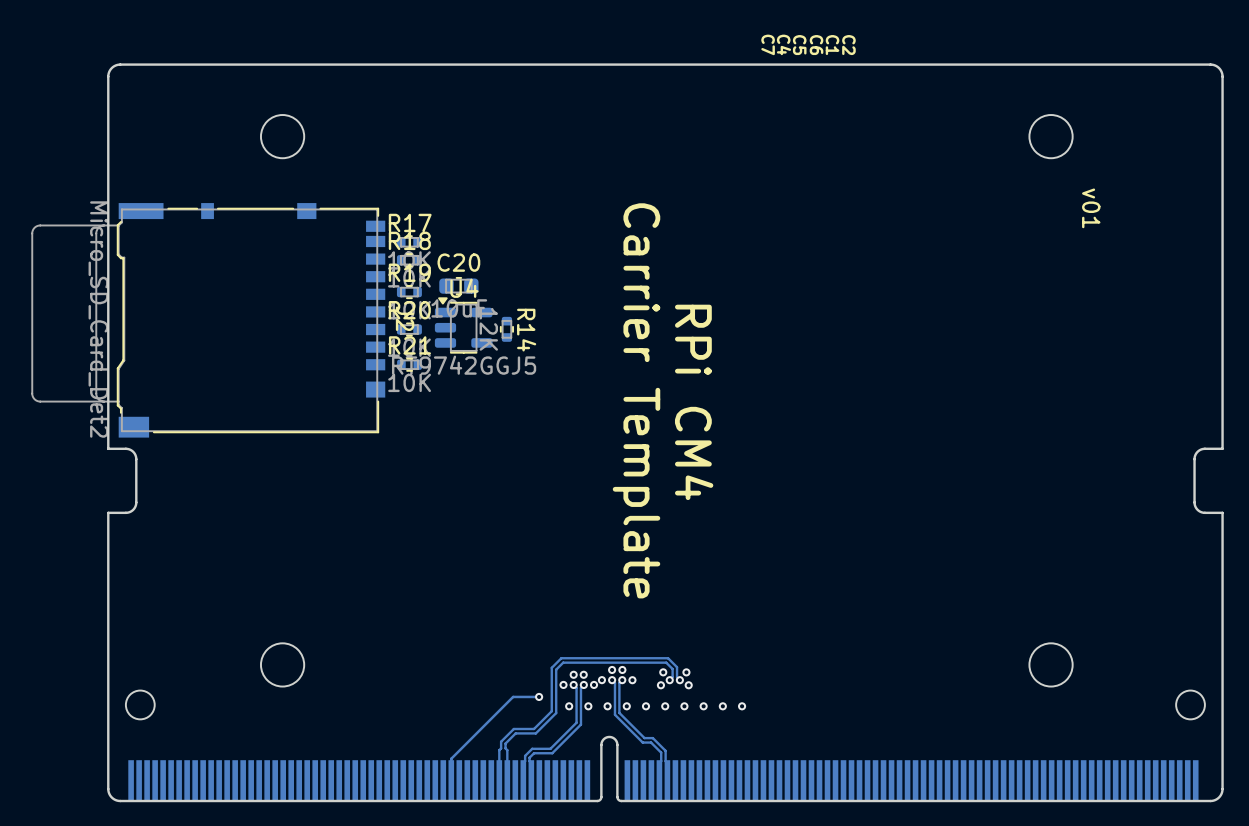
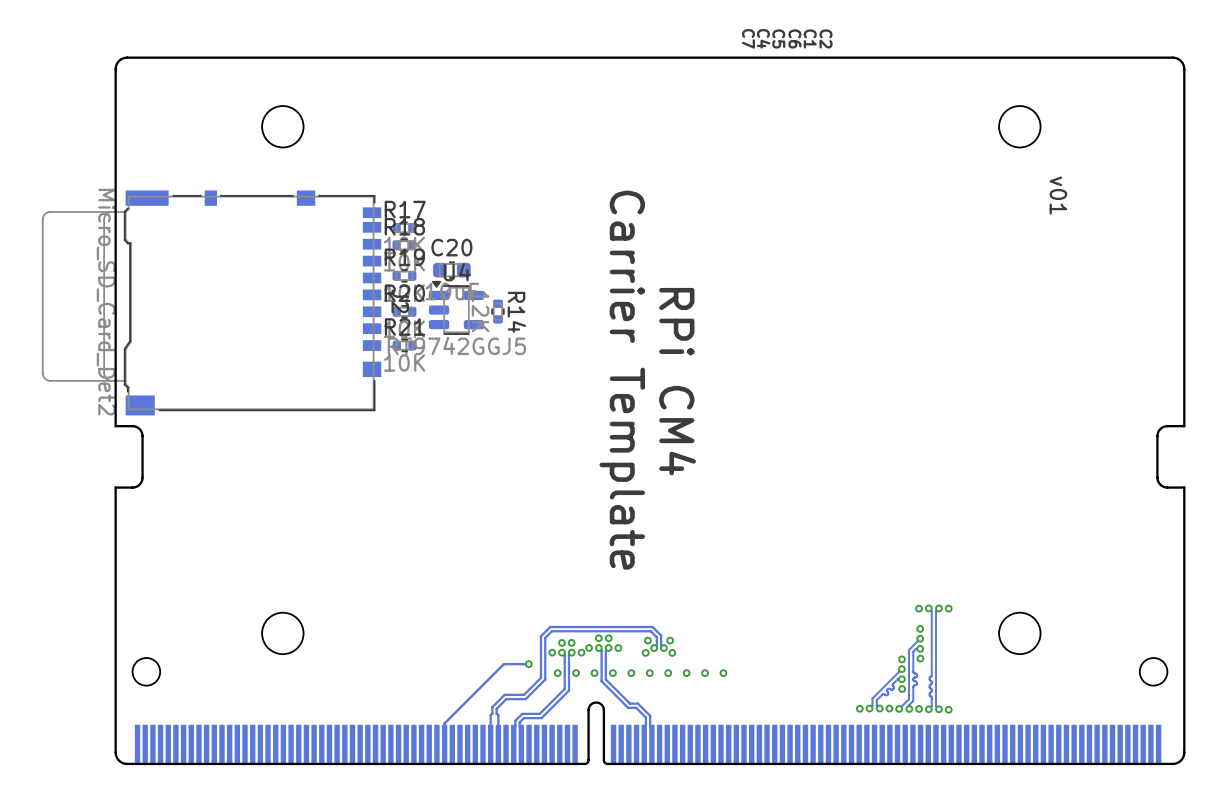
track: none -> (928, 608) (931, 611) (931, 675) (929, 677) (931, 683) (929, 685) (931, 689) (929, 695) (931, 697) (931, 706) (928, 709)
via: none -> (928, 608)
track: none -> (938, 608) (936, 611) (936, 706) (938, 709)
via: none -> (938, 608)
via: none -> (919, 608)
via: none -> (948, 608)
via: none -> (920, 628)
track: none -> (920, 638) (909, 649) (909, 699) (899, 708)
via: none -> (920, 638)
track: none -> (920, 648) (916, 648) (913, 651) (913, 672) (917, 675) (913, 679) (917, 683) (913, 686) (913, 700) (909, 704) (909, 708)
via: none -> (920, 648)
via: none -> (901, 659)
via: none -> (920, 658)
track: none -> (901, 669) (872, 698) (872, 705) (869, 708)
via: none -> (901, 669)
track: none -> (901, 679) (897, 679) (892, 684) (892, 689) (887, 689) (887, 695) (882, 694) (876, 700) (876, 705) (879, 708)
via: none -> (901, 679)
via: none -> (902, 689)
via: none -> (859, 708)
via: none -> (869, 708)
via: none -> (879, 708)
via: none -> (889, 708)
via: none -> (899, 708)
via: none -> (909, 708)
via: none -> (919, 708)
via: none -> (928, 709)
via: none -> (938, 709)
via: none -> (948, 709)

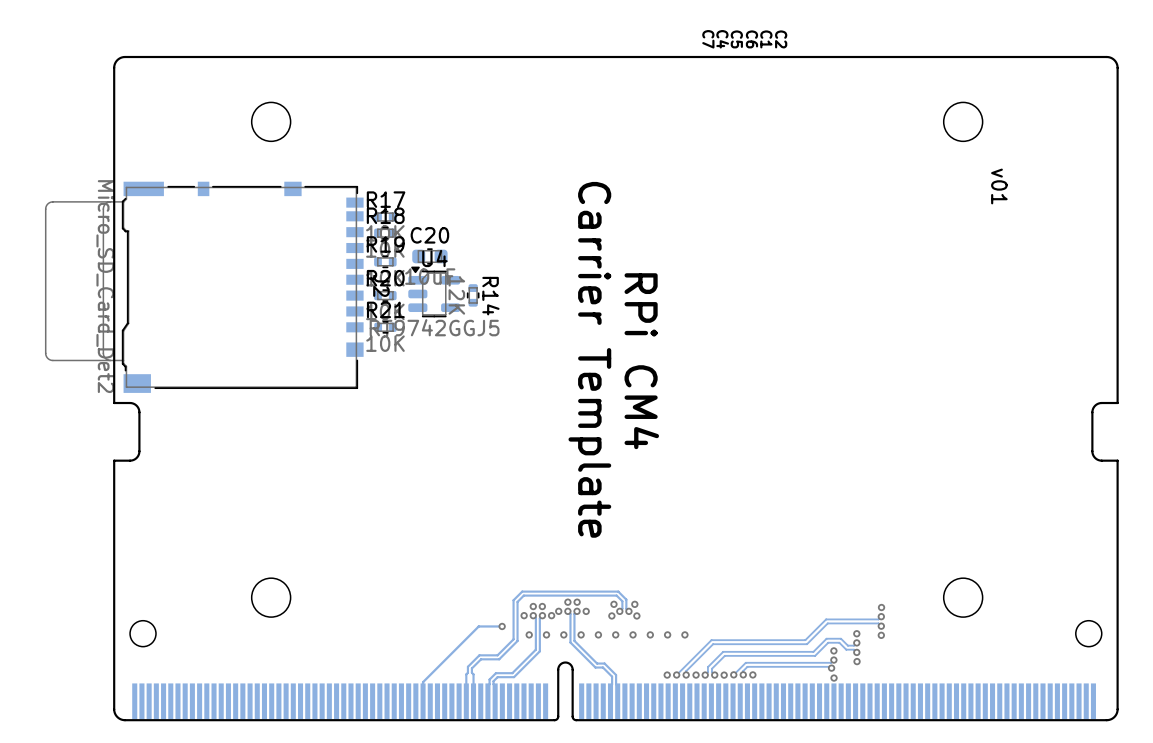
via: (919, 608) -> none
track: (928, 608) (931, 611) (931, 675) (929, 677) (931, 683) (929, 685) (931, 689) (929, 695) (931, 697) (931, 706) (928, 709) -> none
via: (928, 608) -> none
track: (938, 608) (936, 611) (936, 706) (938, 709) -> none
via: (938, 608) -> none
via: (948, 608) -> none
via: (920, 628) -> none
track: (920, 638) (909, 649) (909, 699) (899, 708) -> none
via: (920, 638) -> none
via: none -> (881, 607)
track: (920, 648) (916, 648) (913, 651) (913, 672) (917, 675) (913, 679) (917, 683) (913, 686) (913, 700) (909, 704) (909, 708) -> none
via: (920, 648) -> none
track: none -> (881, 616) (878, 619) (826, 619) (805, 640) (711, 640) (676, 674)
via: none -> (881, 616)
via: (920, 658) -> none
via: (901, 659) -> none
track: none -> (881, 626) (878, 623) (827, 623) (807, 644) (713, 644) (686, 671) (686, 674)
via: none -> (881, 626)
track: (901, 669) (872, 698) (872, 705) (869, 708) -> none
via: (901, 669) -> none
via: none -> (856, 633)
via: none -> (881, 635)
track: (901, 679) (897, 679) (892, 684) (892, 689) (887, 689) (887, 695) (882, 694) (876, 700) (876, 705) (879, 708) -> none
via: (901, 679) -> none
track: none -> (856, 642) (854, 645) (847, 645) (841, 638) (826, 638) (813, 651) (723, 651) (707, 667) (707, 672) (705, 675)
via: none -> (856, 642)
via: (902, 689) -> none
via: none -> (833, 650)
track: none -> (856, 652) (854, 649) (846, 649) (839, 642) (828, 642) (815, 655) (724, 655) (711, 668) (714, 675)
via: none -> (856, 652)
track: none -> (833, 660) (831, 662) (745, 662) (733, 674)
via: none -> (833, 660)
via: none -> (857, 661)
via: (859, 708) -> none
via: (869, 708) -> none
via: (889, 708) -> none
via: (899, 708) -> none
via: (909, 708) -> none
via: (919, 708) -> none
via: (928, 709) -> none
via: (938, 709) -> none
via: (948, 709) -> none
track: none -> (833, 669) (831, 666) (747, 666) (743, 671) (743, 674)
via: none -> (667, 675)
via: none -> (676, 674)
via: none -> (686, 674)
via: none -> (696, 675)
via: none -> (705, 675)
via: none -> (714, 675)
via: none -> (724, 675)
via: none -> (733, 674)
via: none -> (743, 674)
via: none -> (752, 674)
via: none -> (834, 678)

